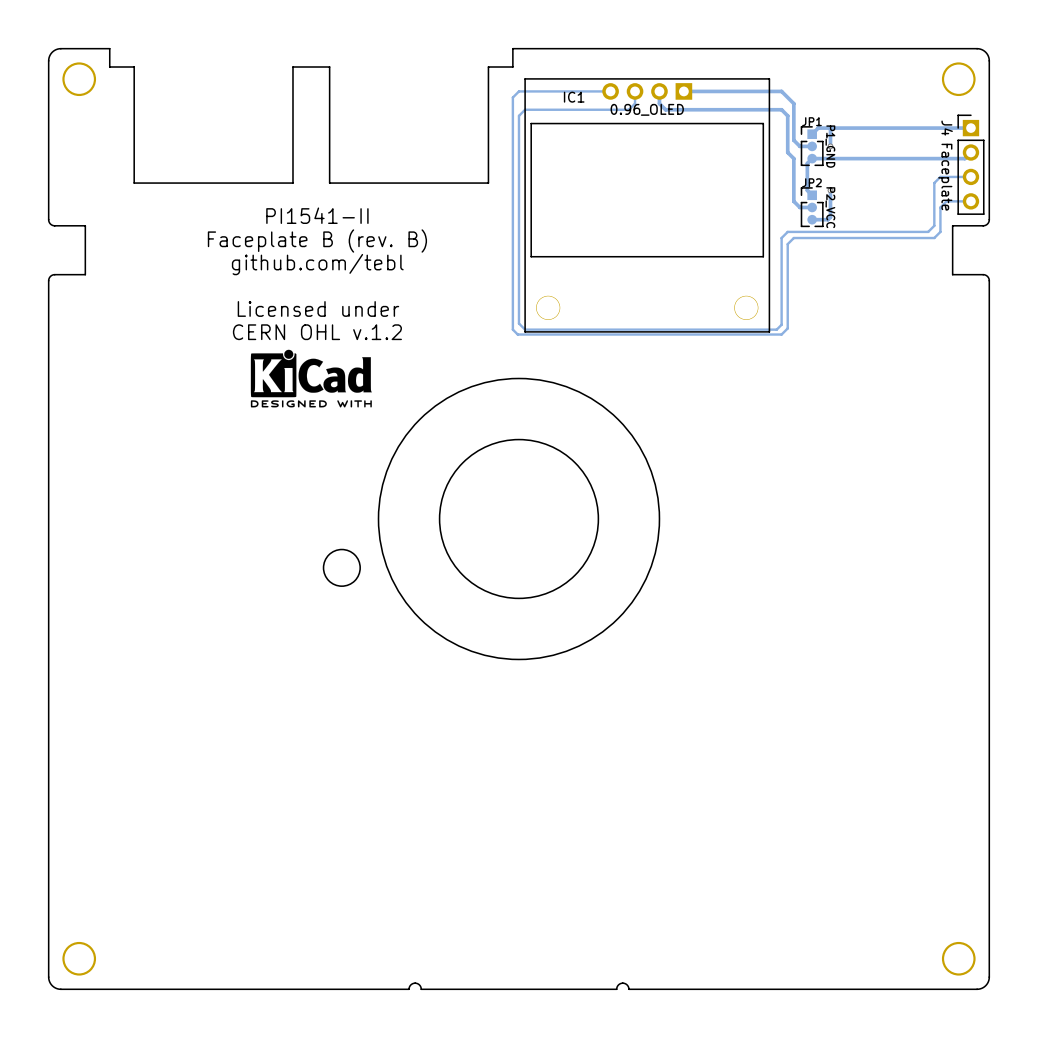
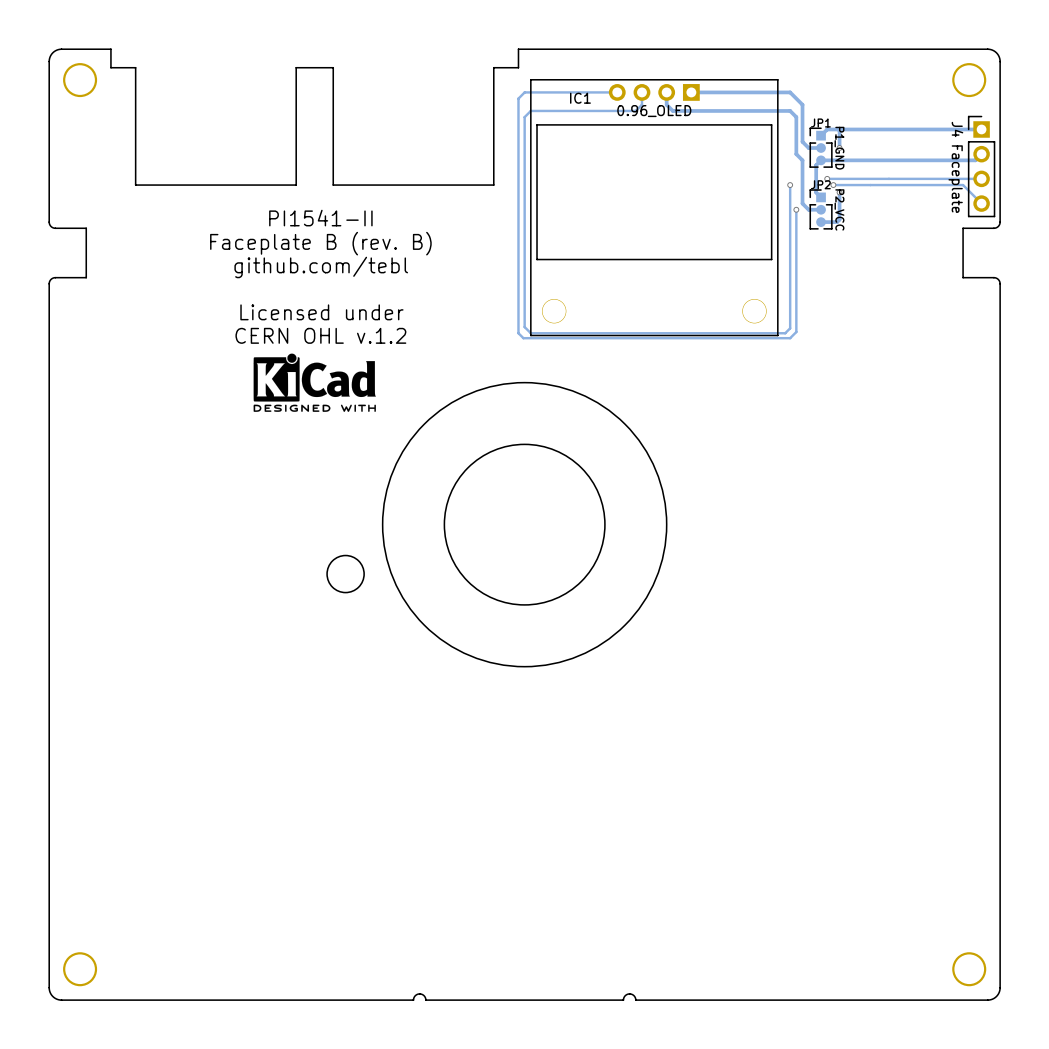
via: none -> (827, 178)
track: (940, 176) (934, 183) (934, 225) (928, 231) (787, 231) (781, 238) -> (950, 178) (827, 178)
track: none -> (790, 185) (790, 240)
via: none -> (790, 185)
via: none -> (833, 185)
track: (970, 201) (946, 201) (940, 207) (940, 231) (934, 238) (793, 238) (787, 244) -> (981, 203) (963, 185) (833, 185)
track: none -> (796, 209) (796, 246)
via: none -> (796, 209)

